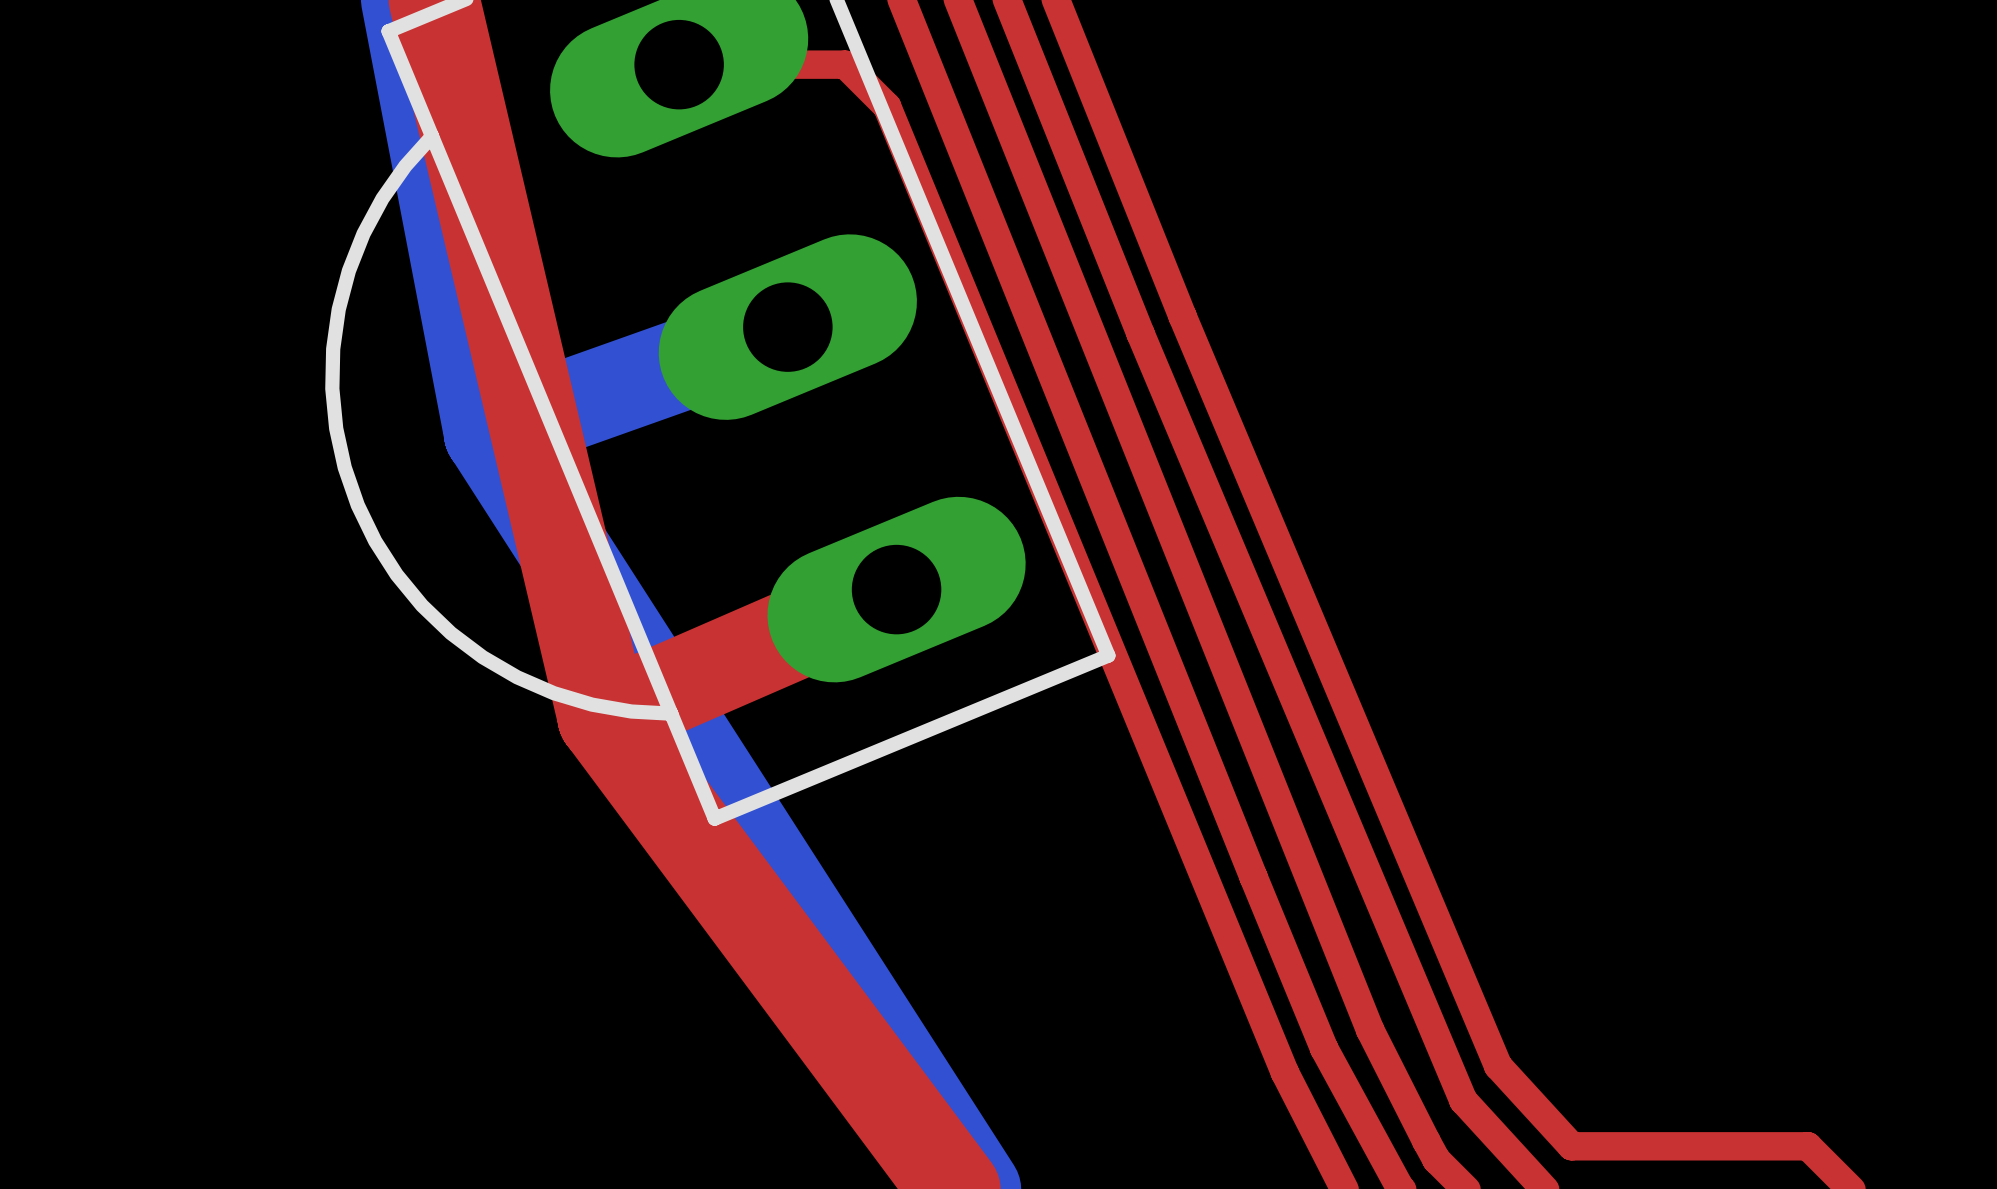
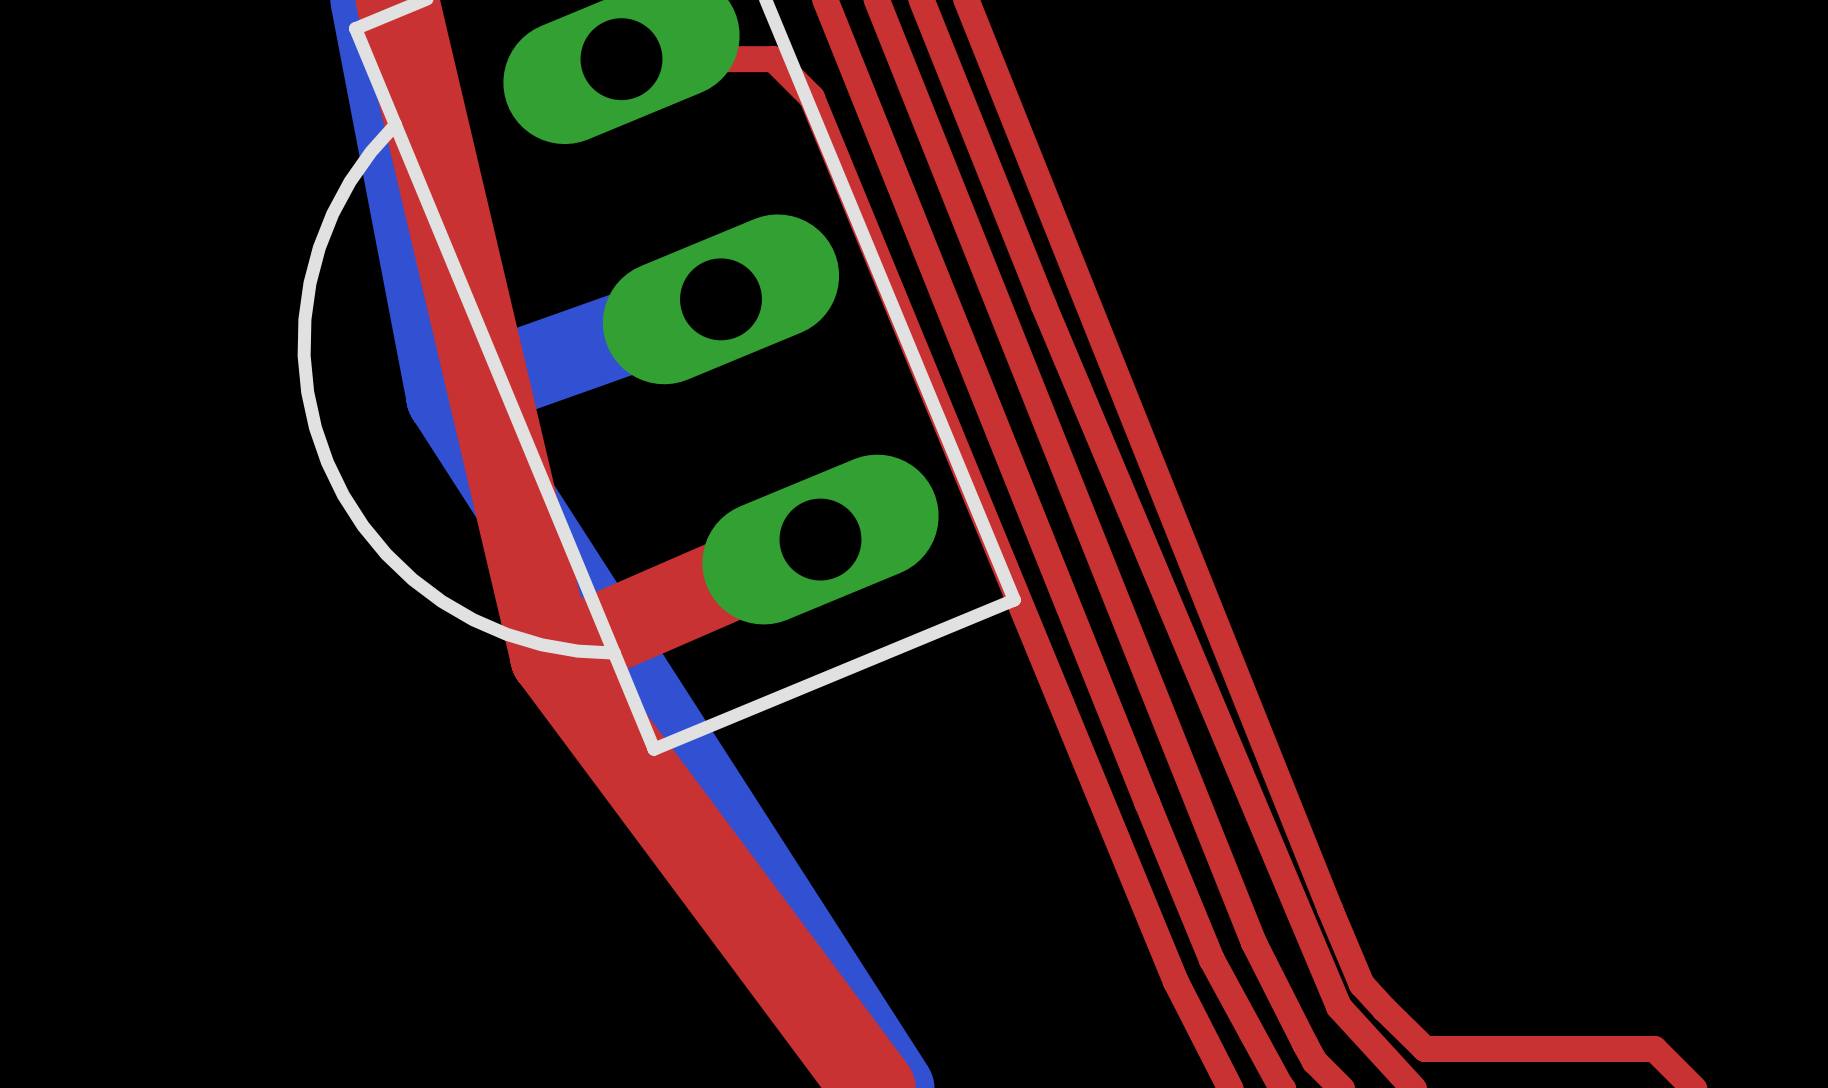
top track: (1182, 316) (1498, 1065) (1571, 1146) -> (1082, 289) (1361, 984) (1425, 1049) (1438, 1049)

